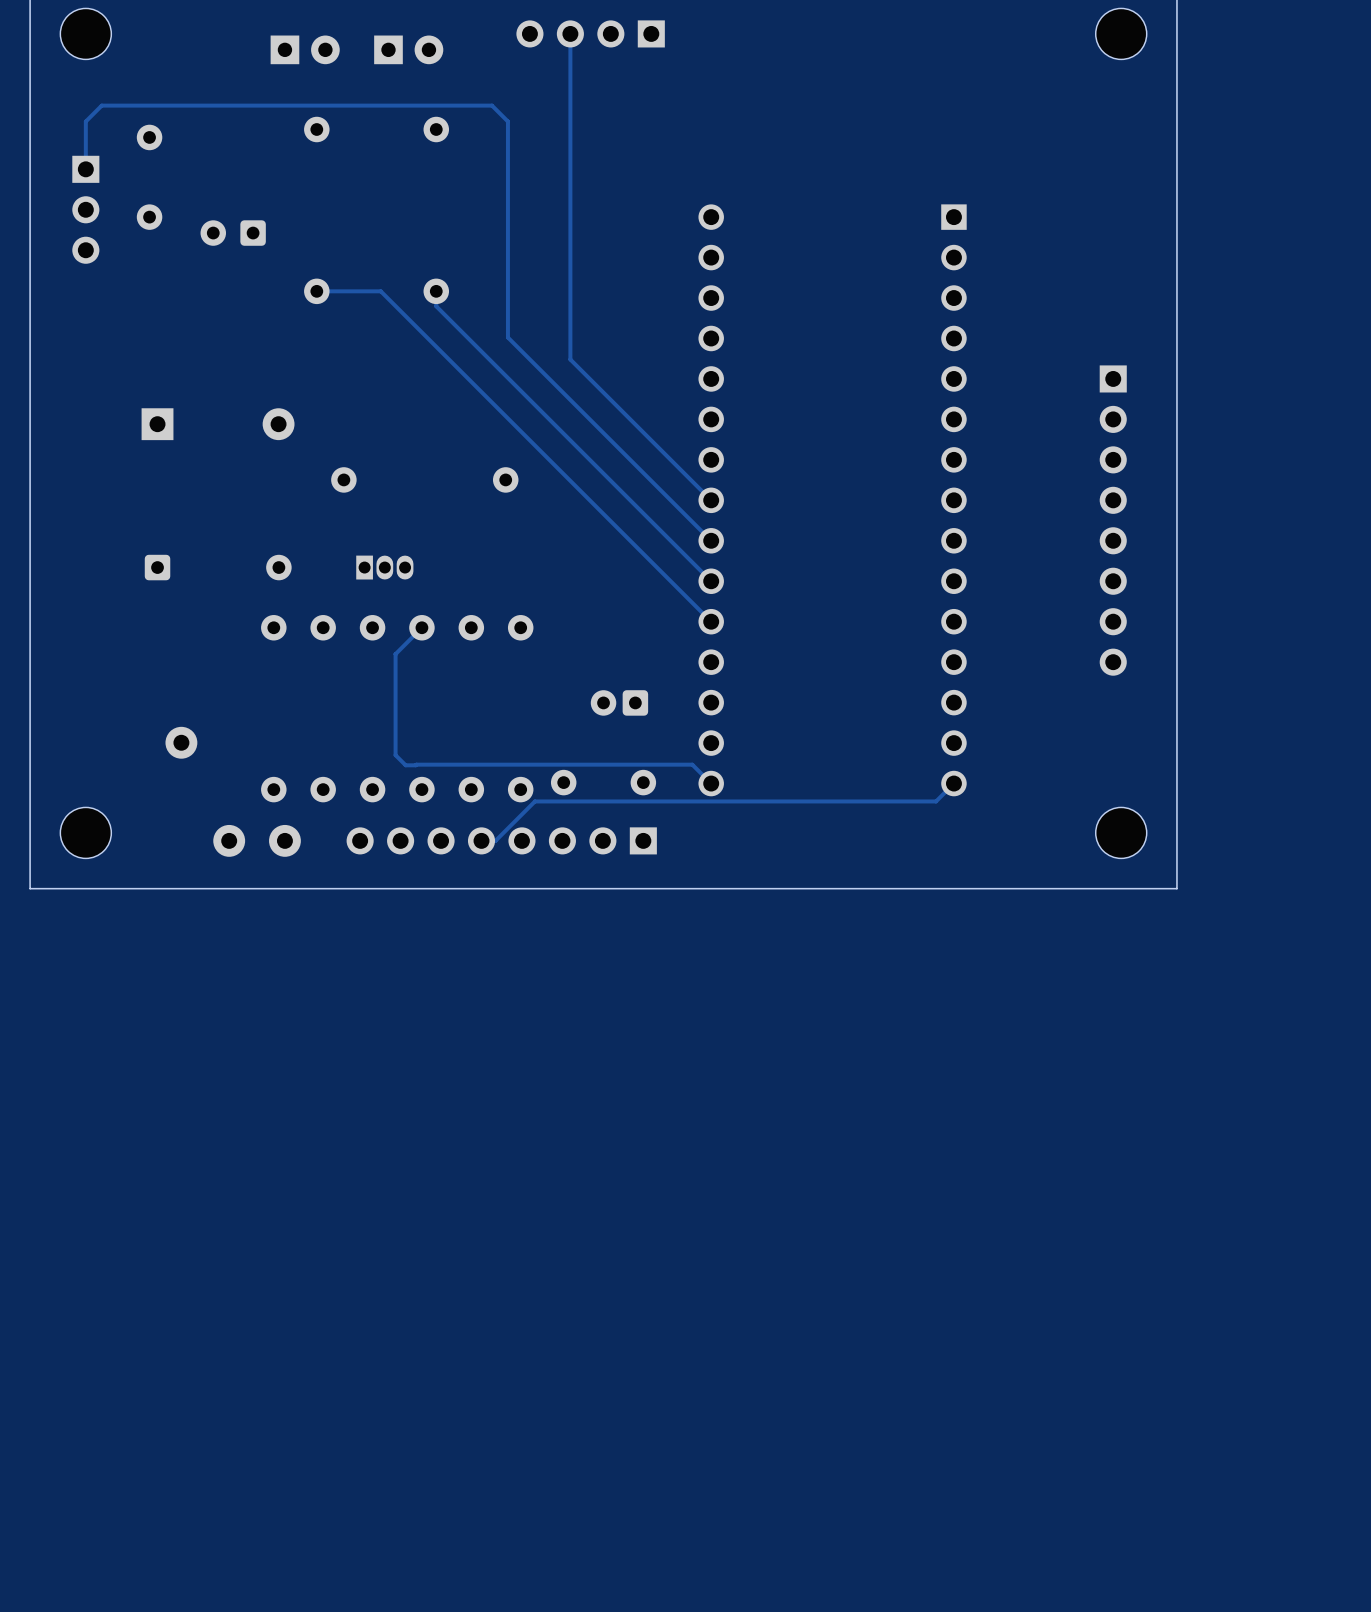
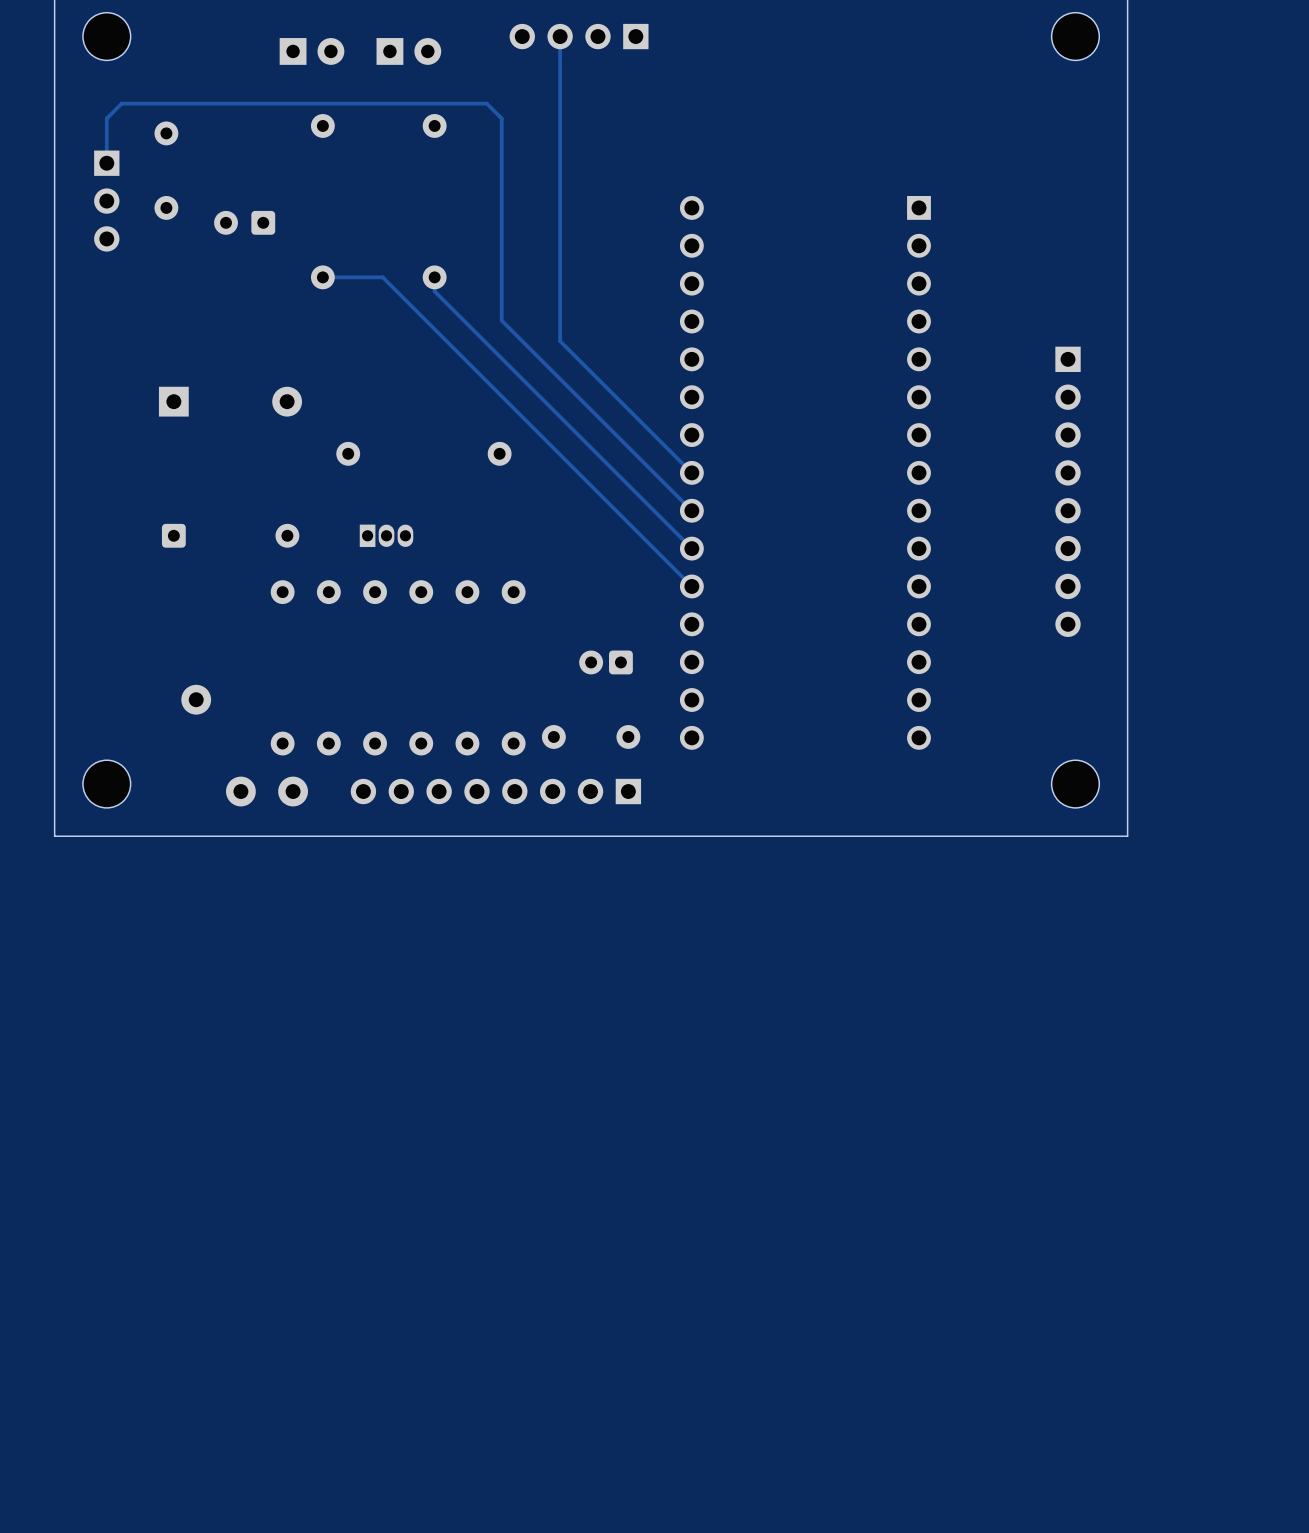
track: (421, 627) (395, 654) -> none
track: (395, 654) (395, 755) (405, 765) (692, 764) (711, 783) -> none
track: (953, 783) (936, 801) (534, 801) (495, 840) (481, 840) -> none

